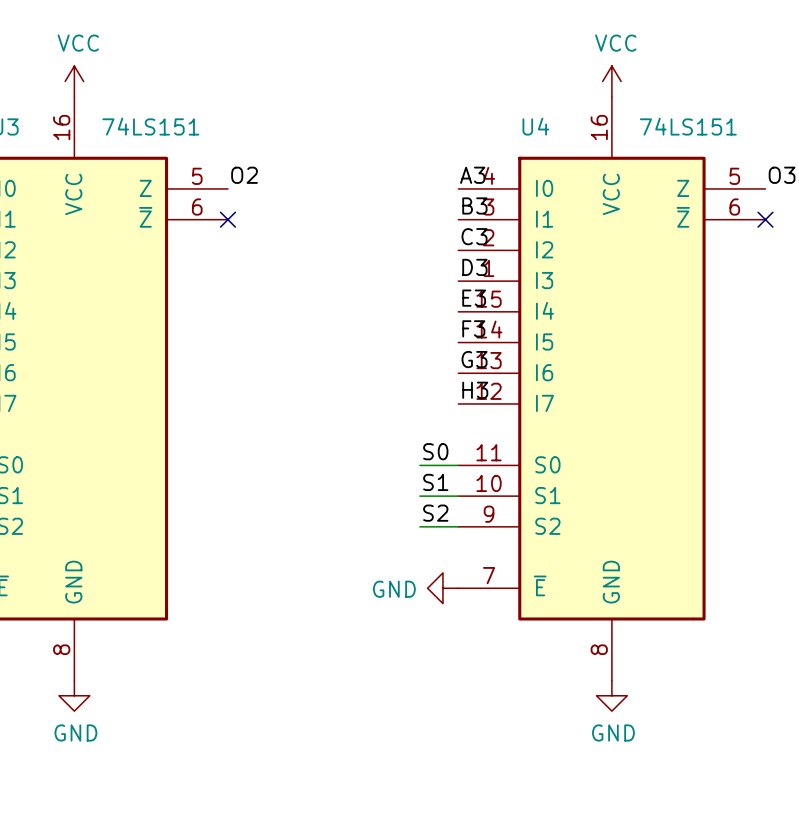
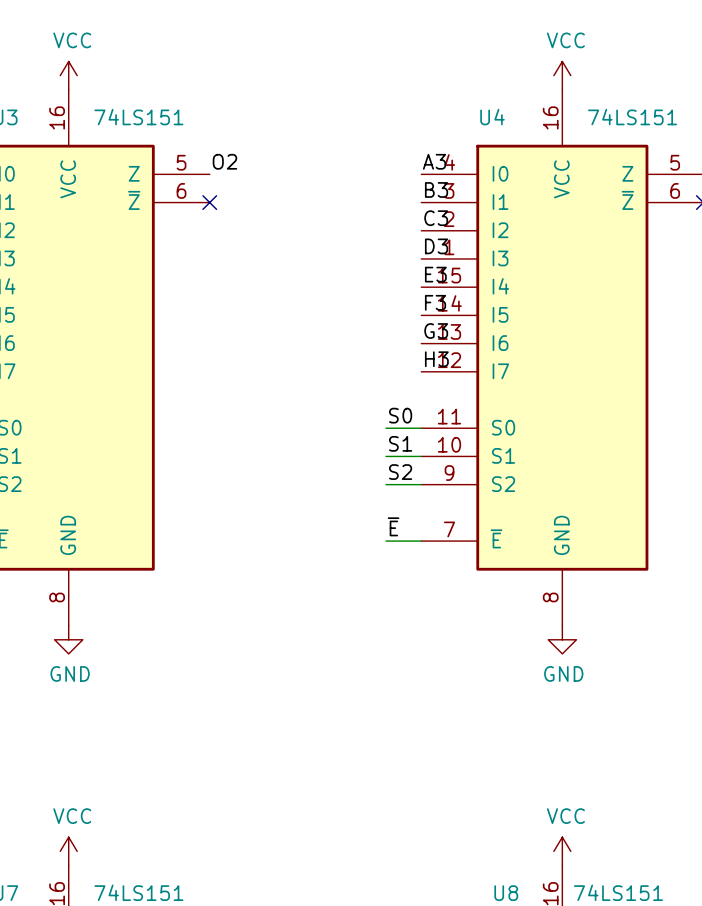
label: none -> ~{E} (393, 526)
wire: none -> (386, 541) (421, 541)
power symbol: GND (442, 588) -> none

